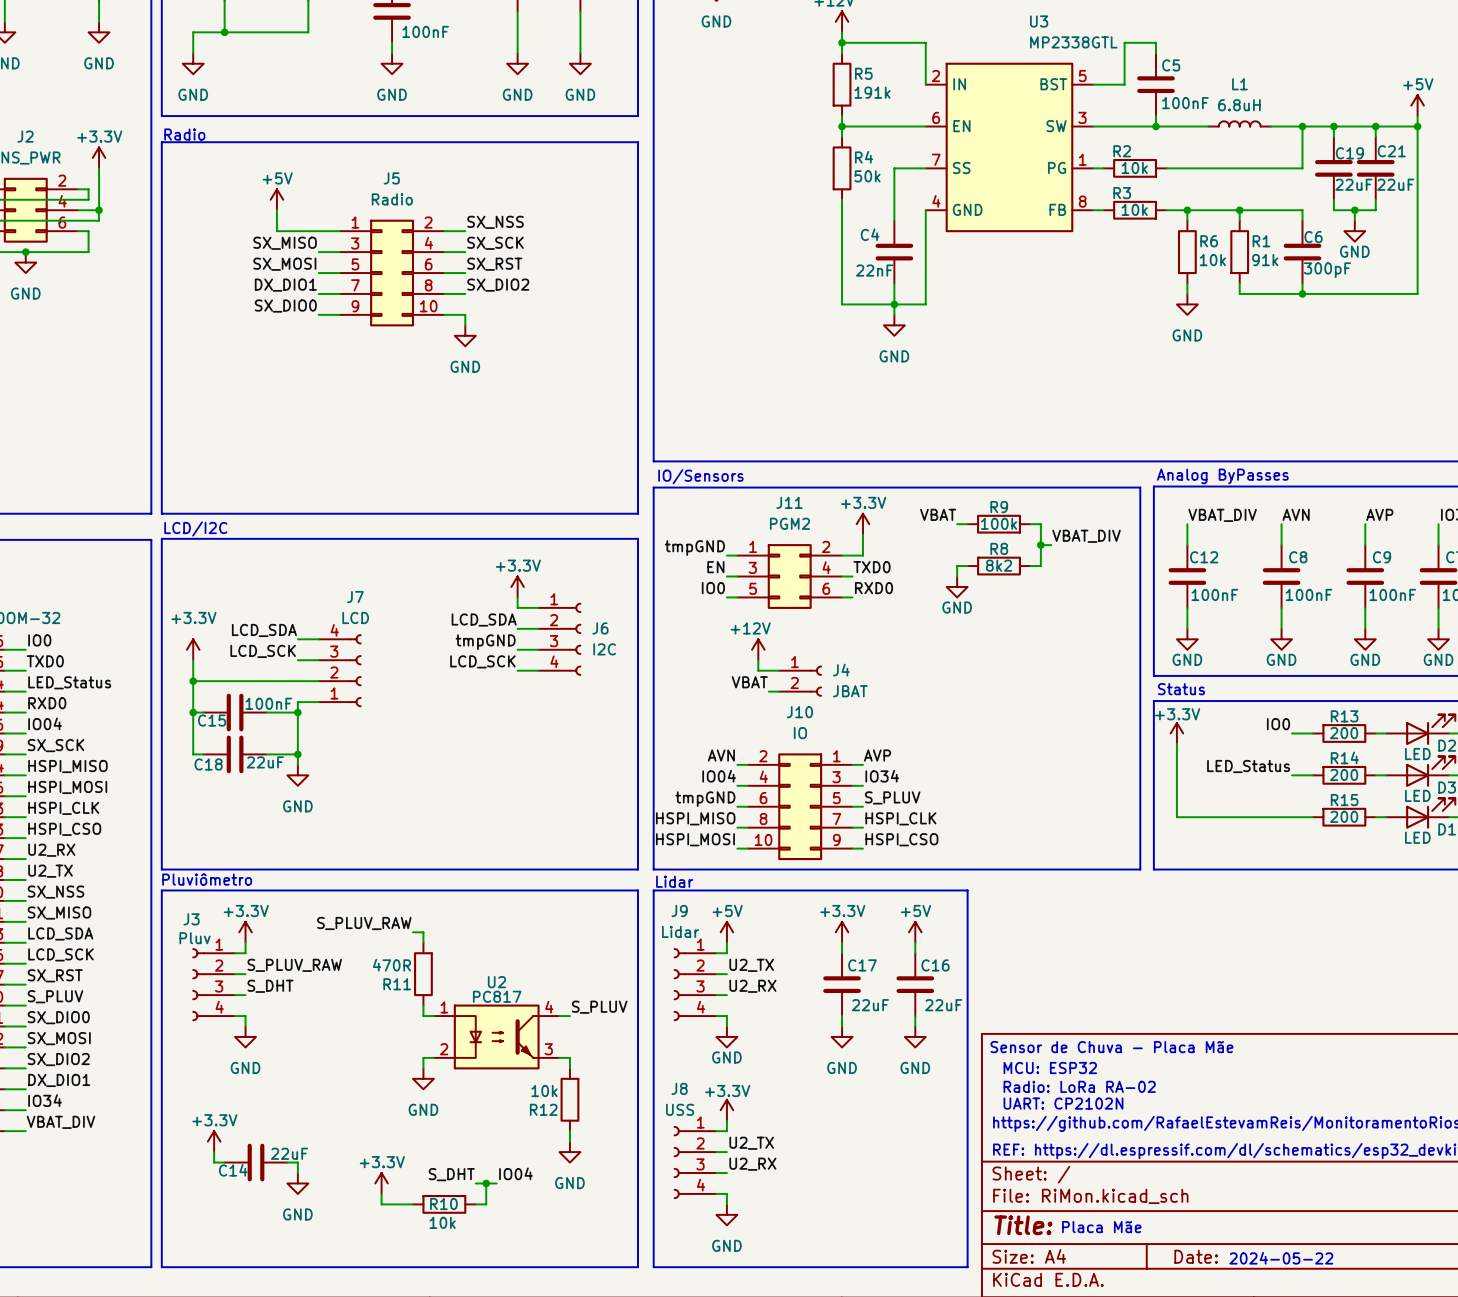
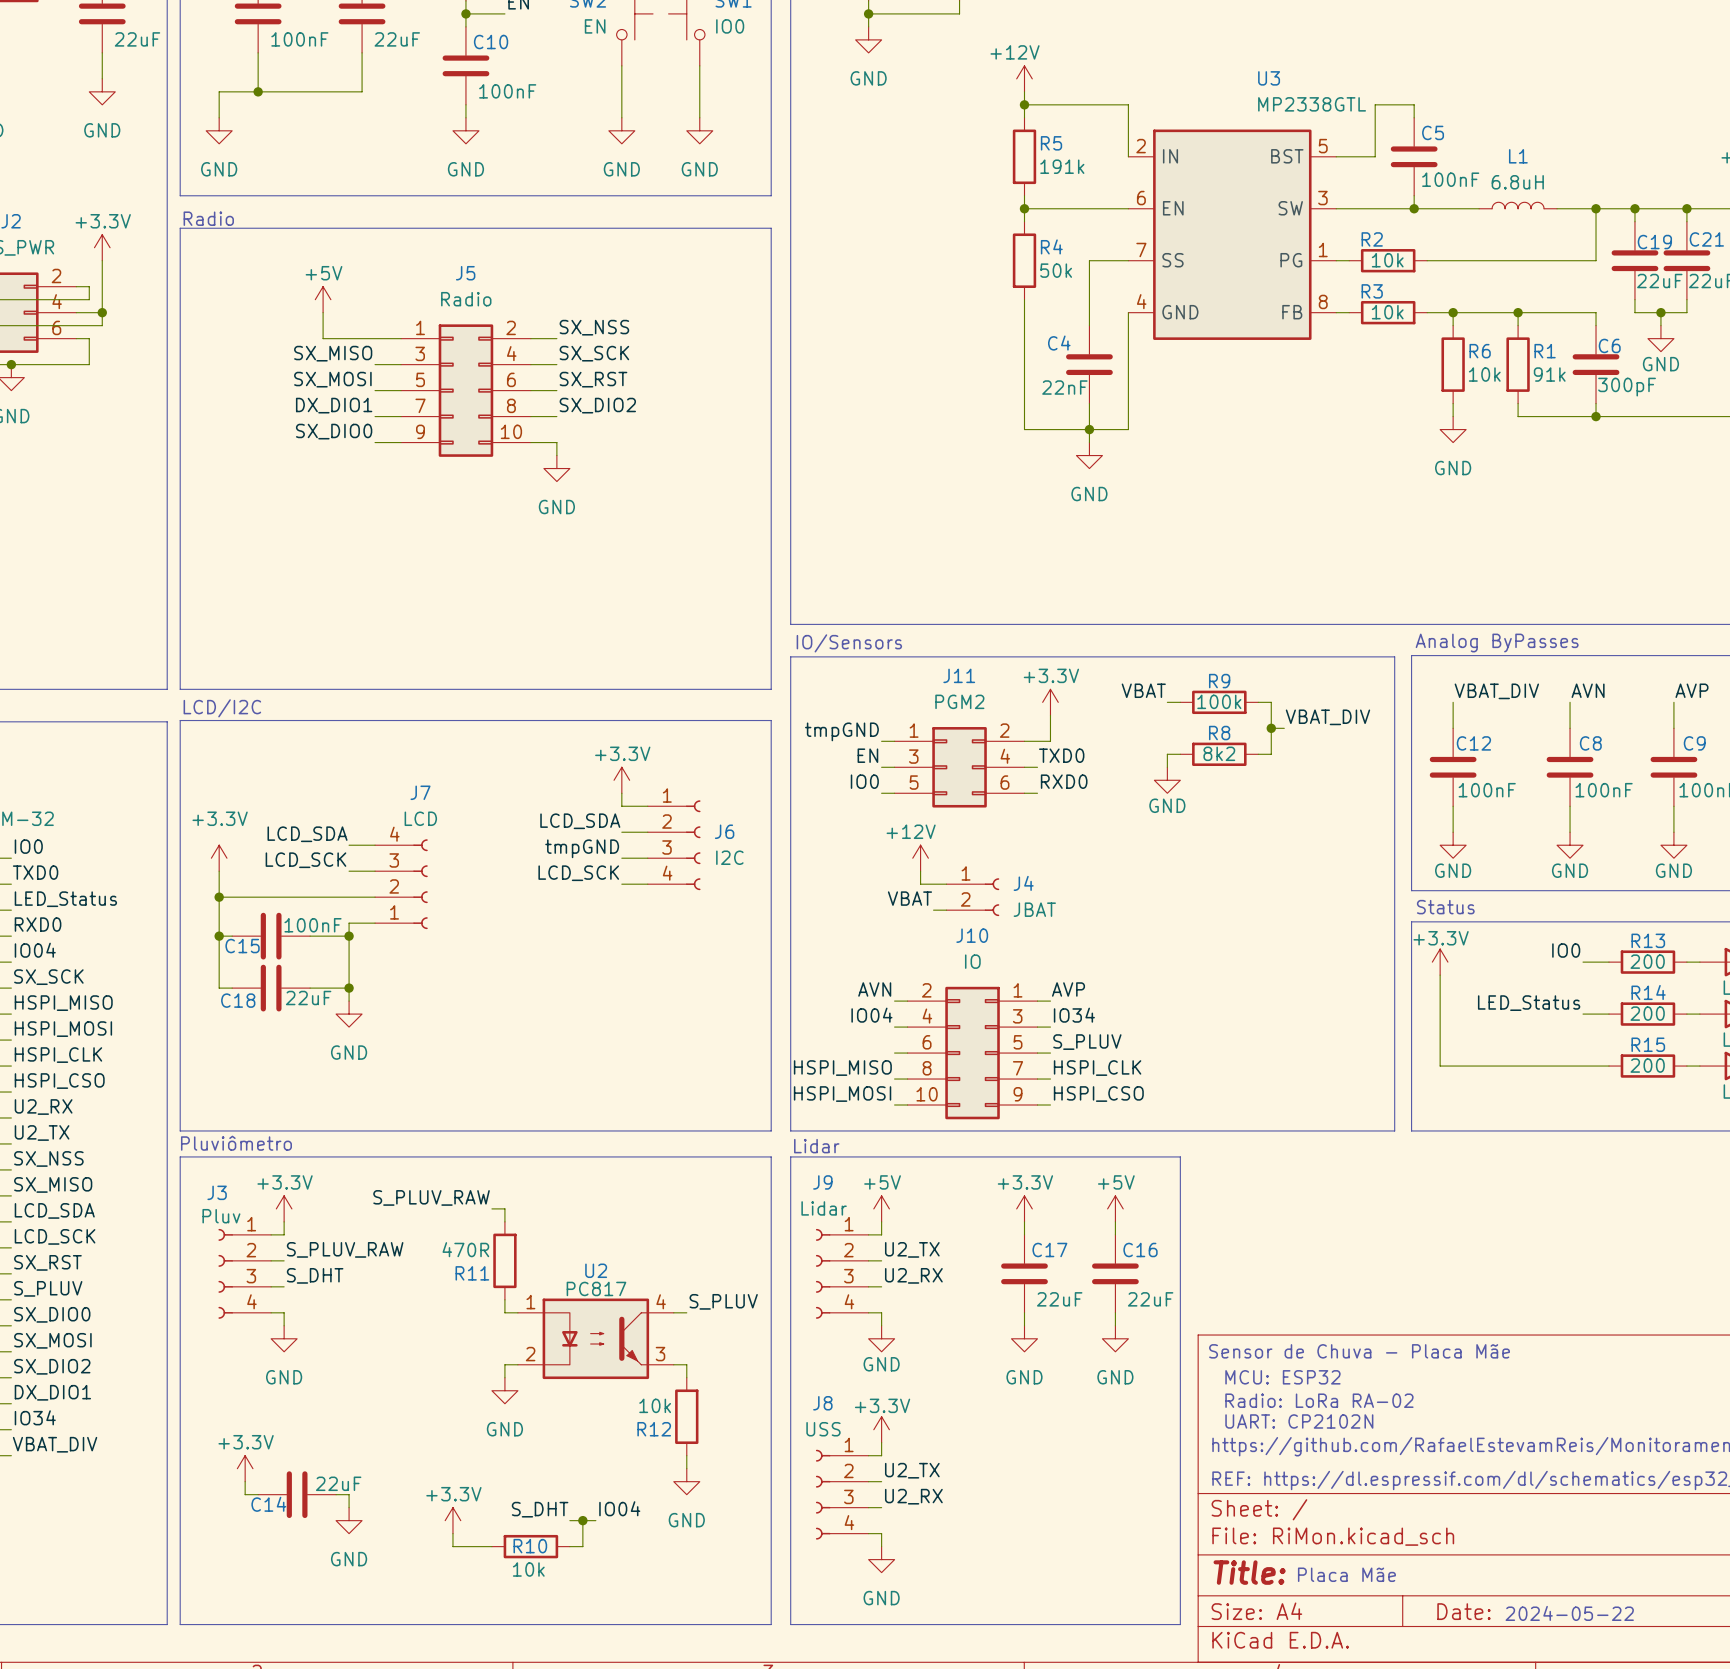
label: tmpGND (705, 799) -> none

